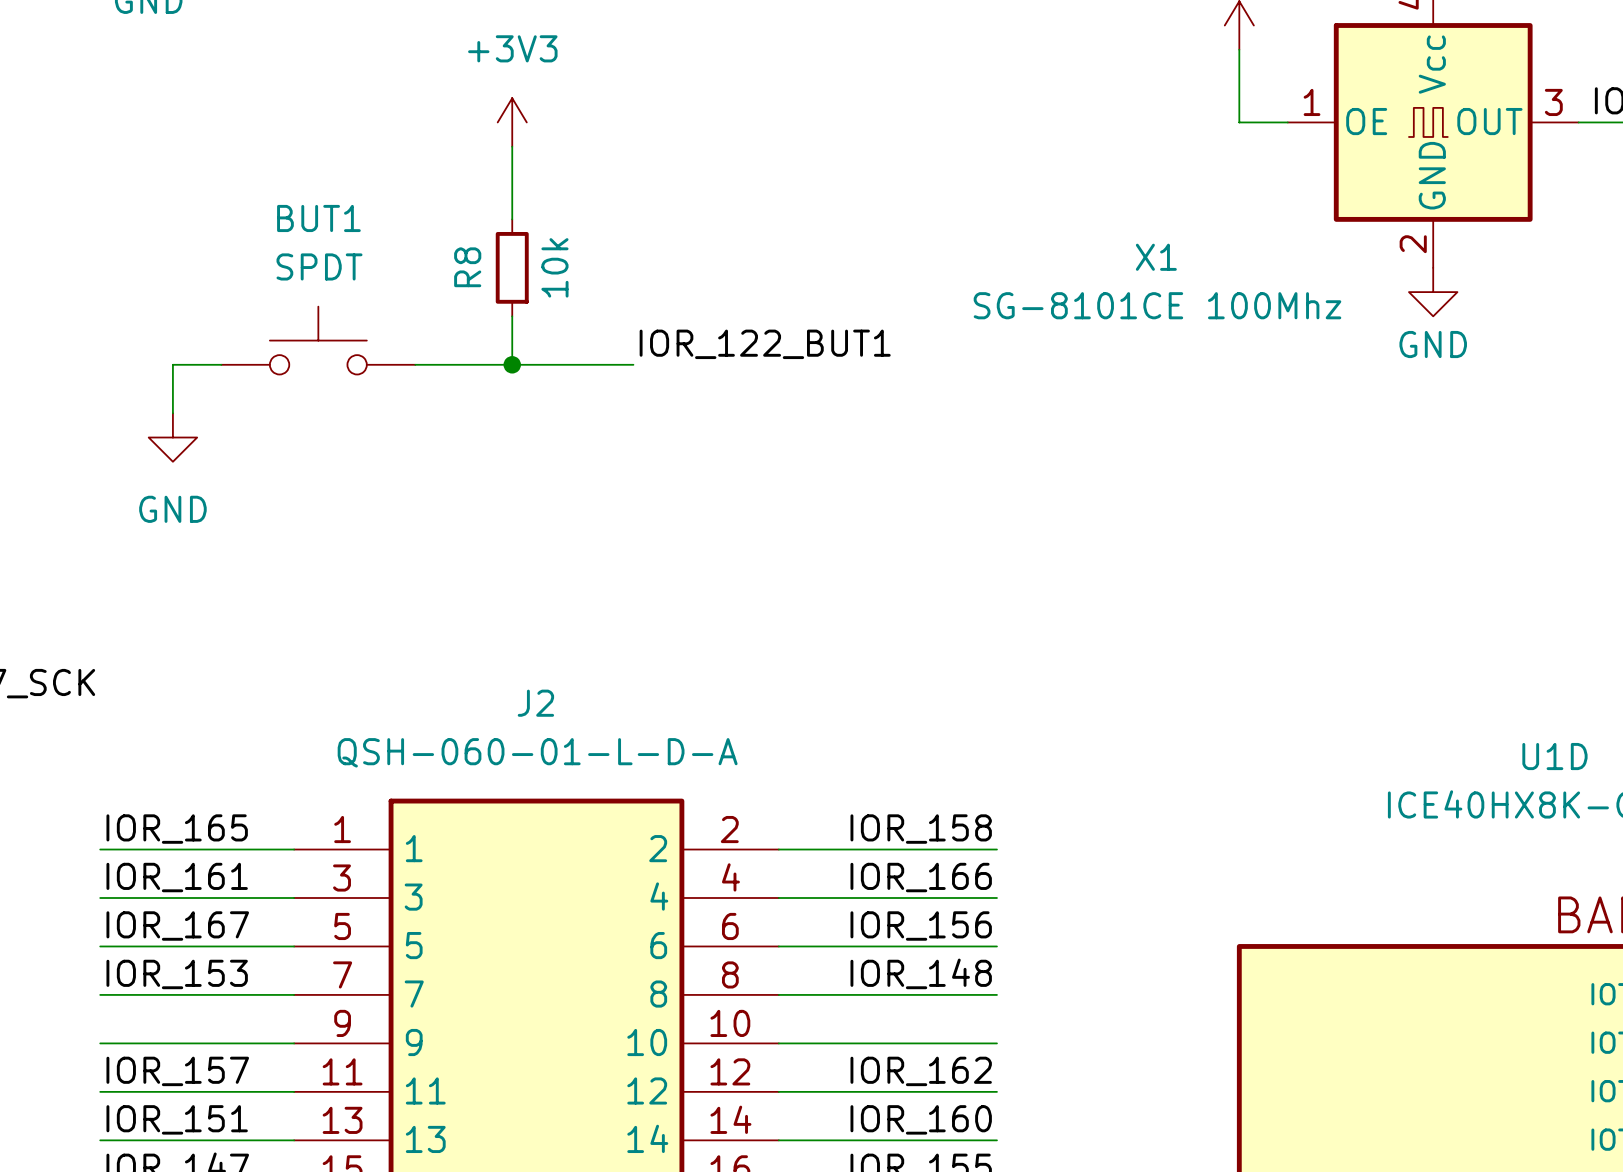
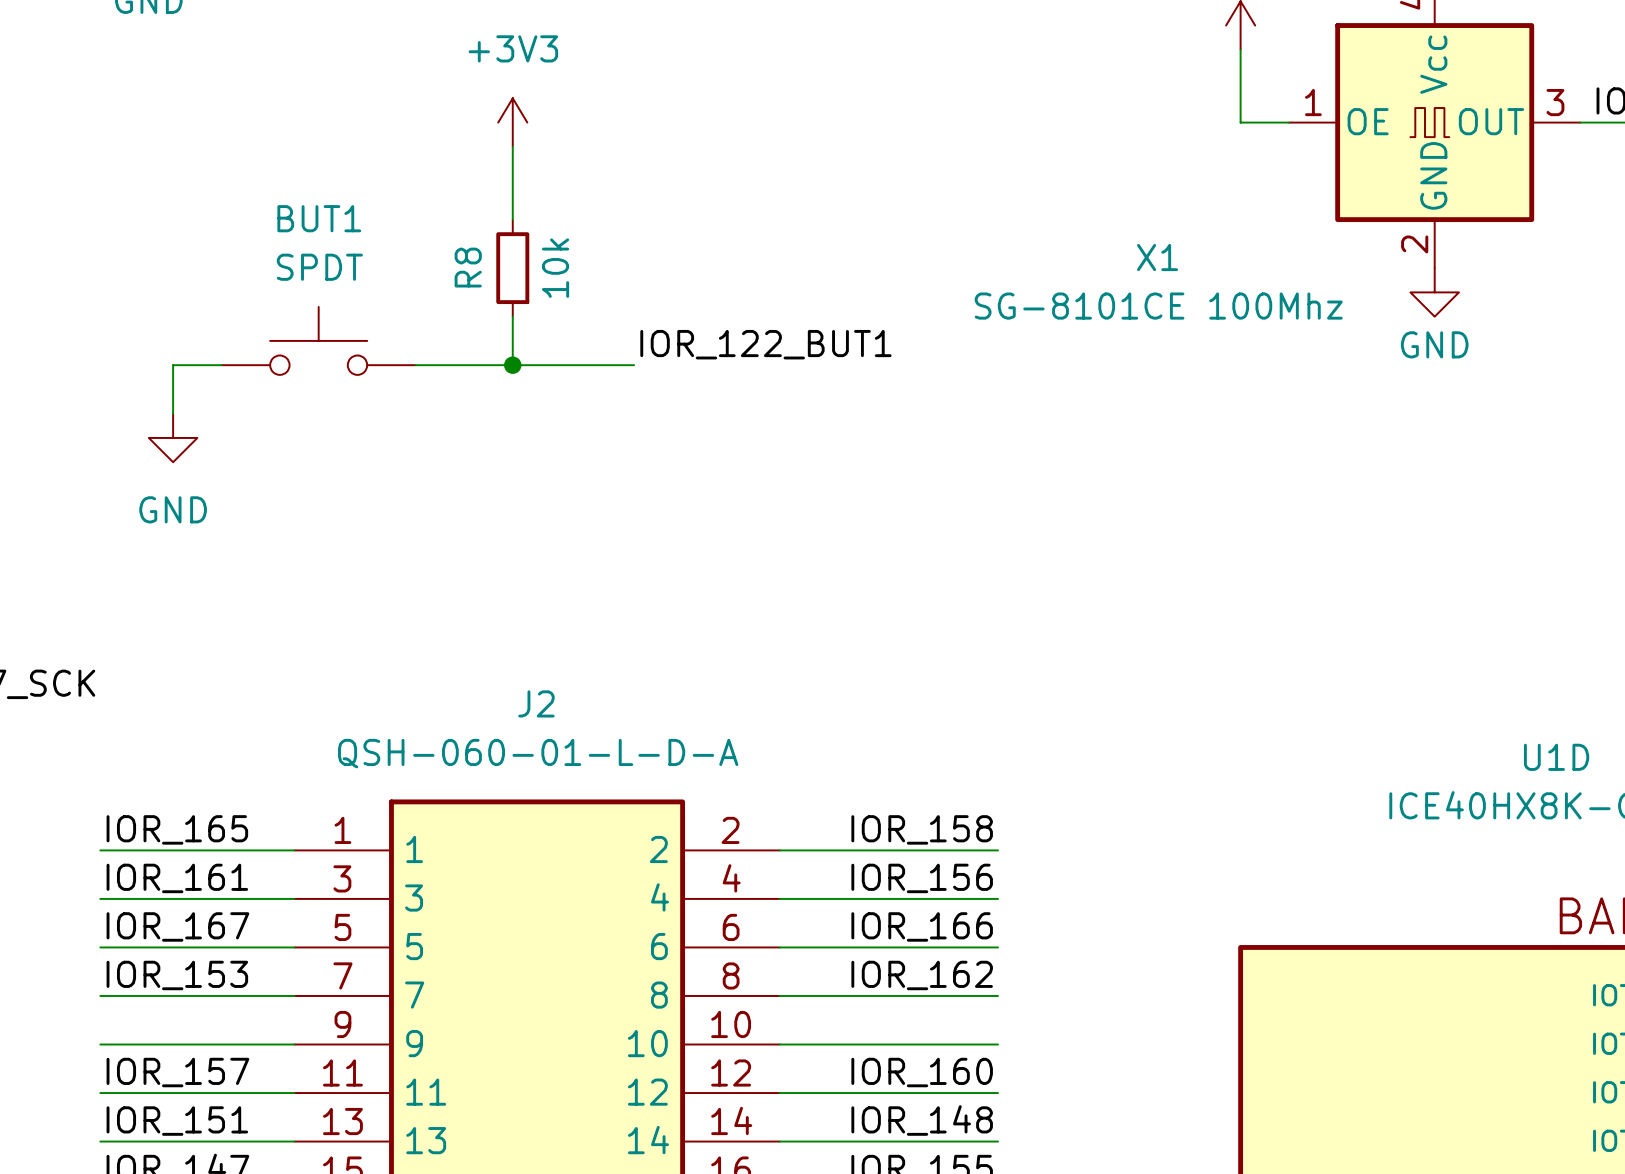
label: IOR_166 (921, 877) -> IOR_156 (922, 878)
label: IOR_156 (921, 925) -> IOR_166 (922, 926)
label: IOR_148 (921, 973) -> IOR_162 (922, 975)
label: IOR_162 (921, 1071) -> IOR_160 (922, 1072)
label: IOR_160 (921, 1119) -> IOR_148 (922, 1120)

